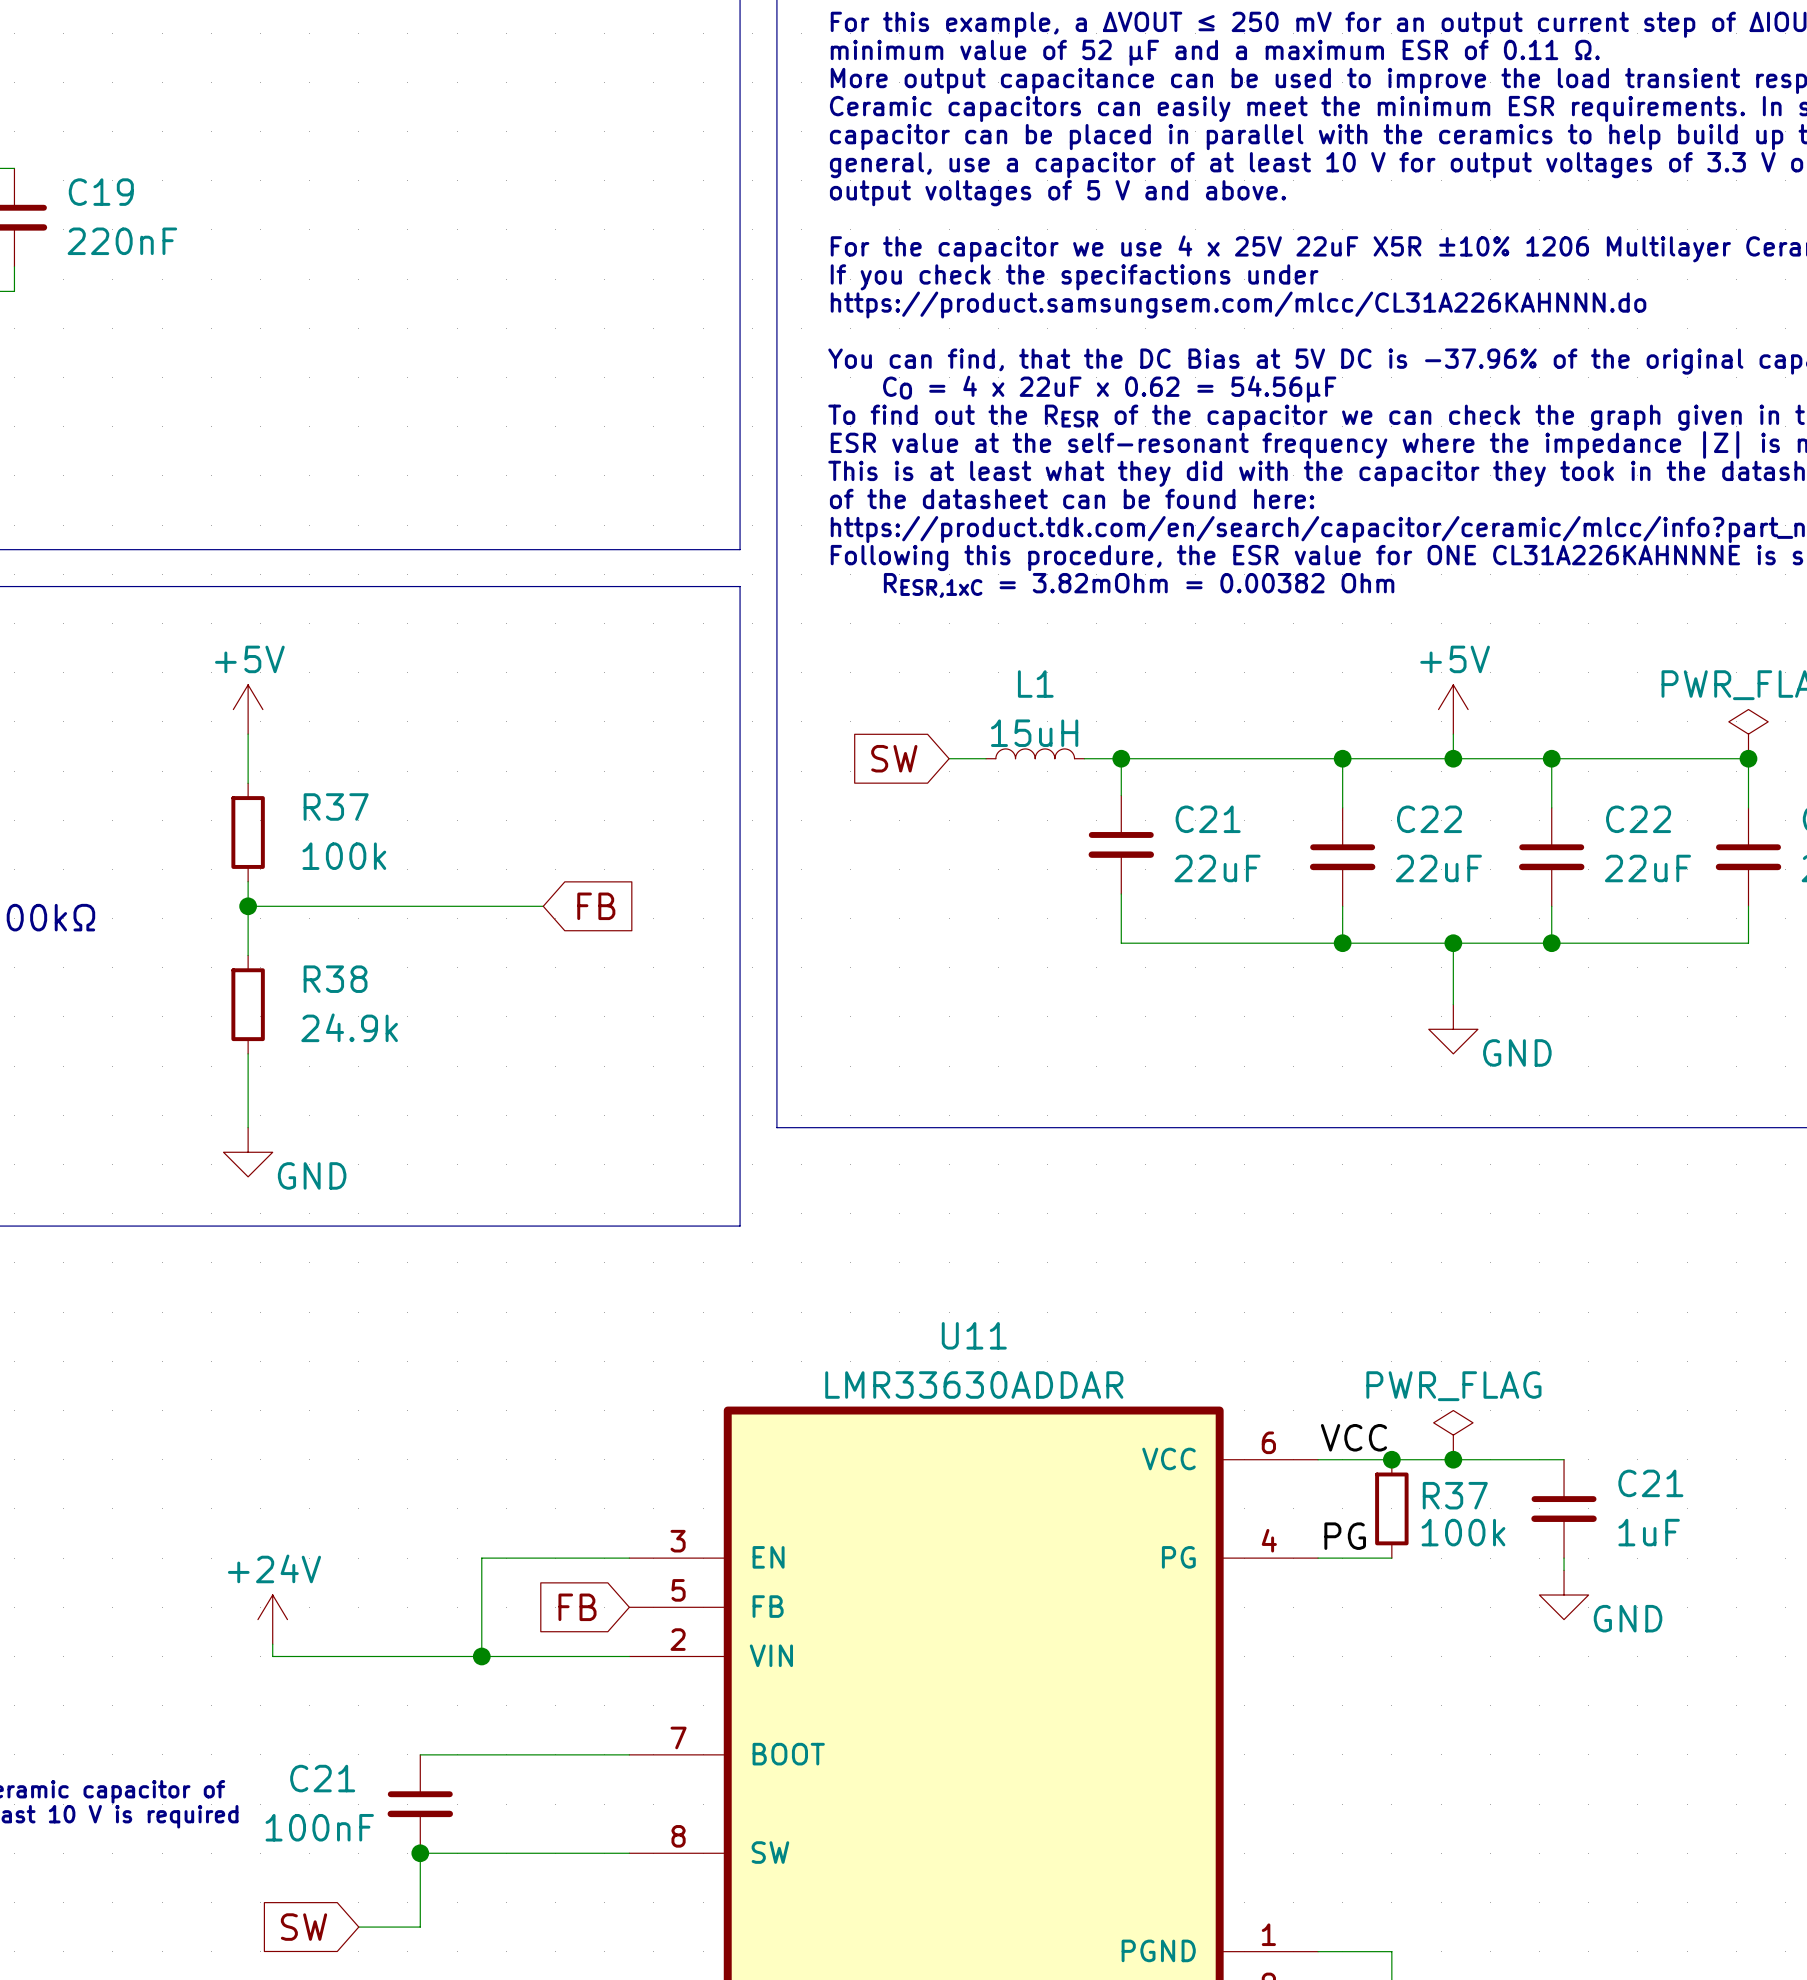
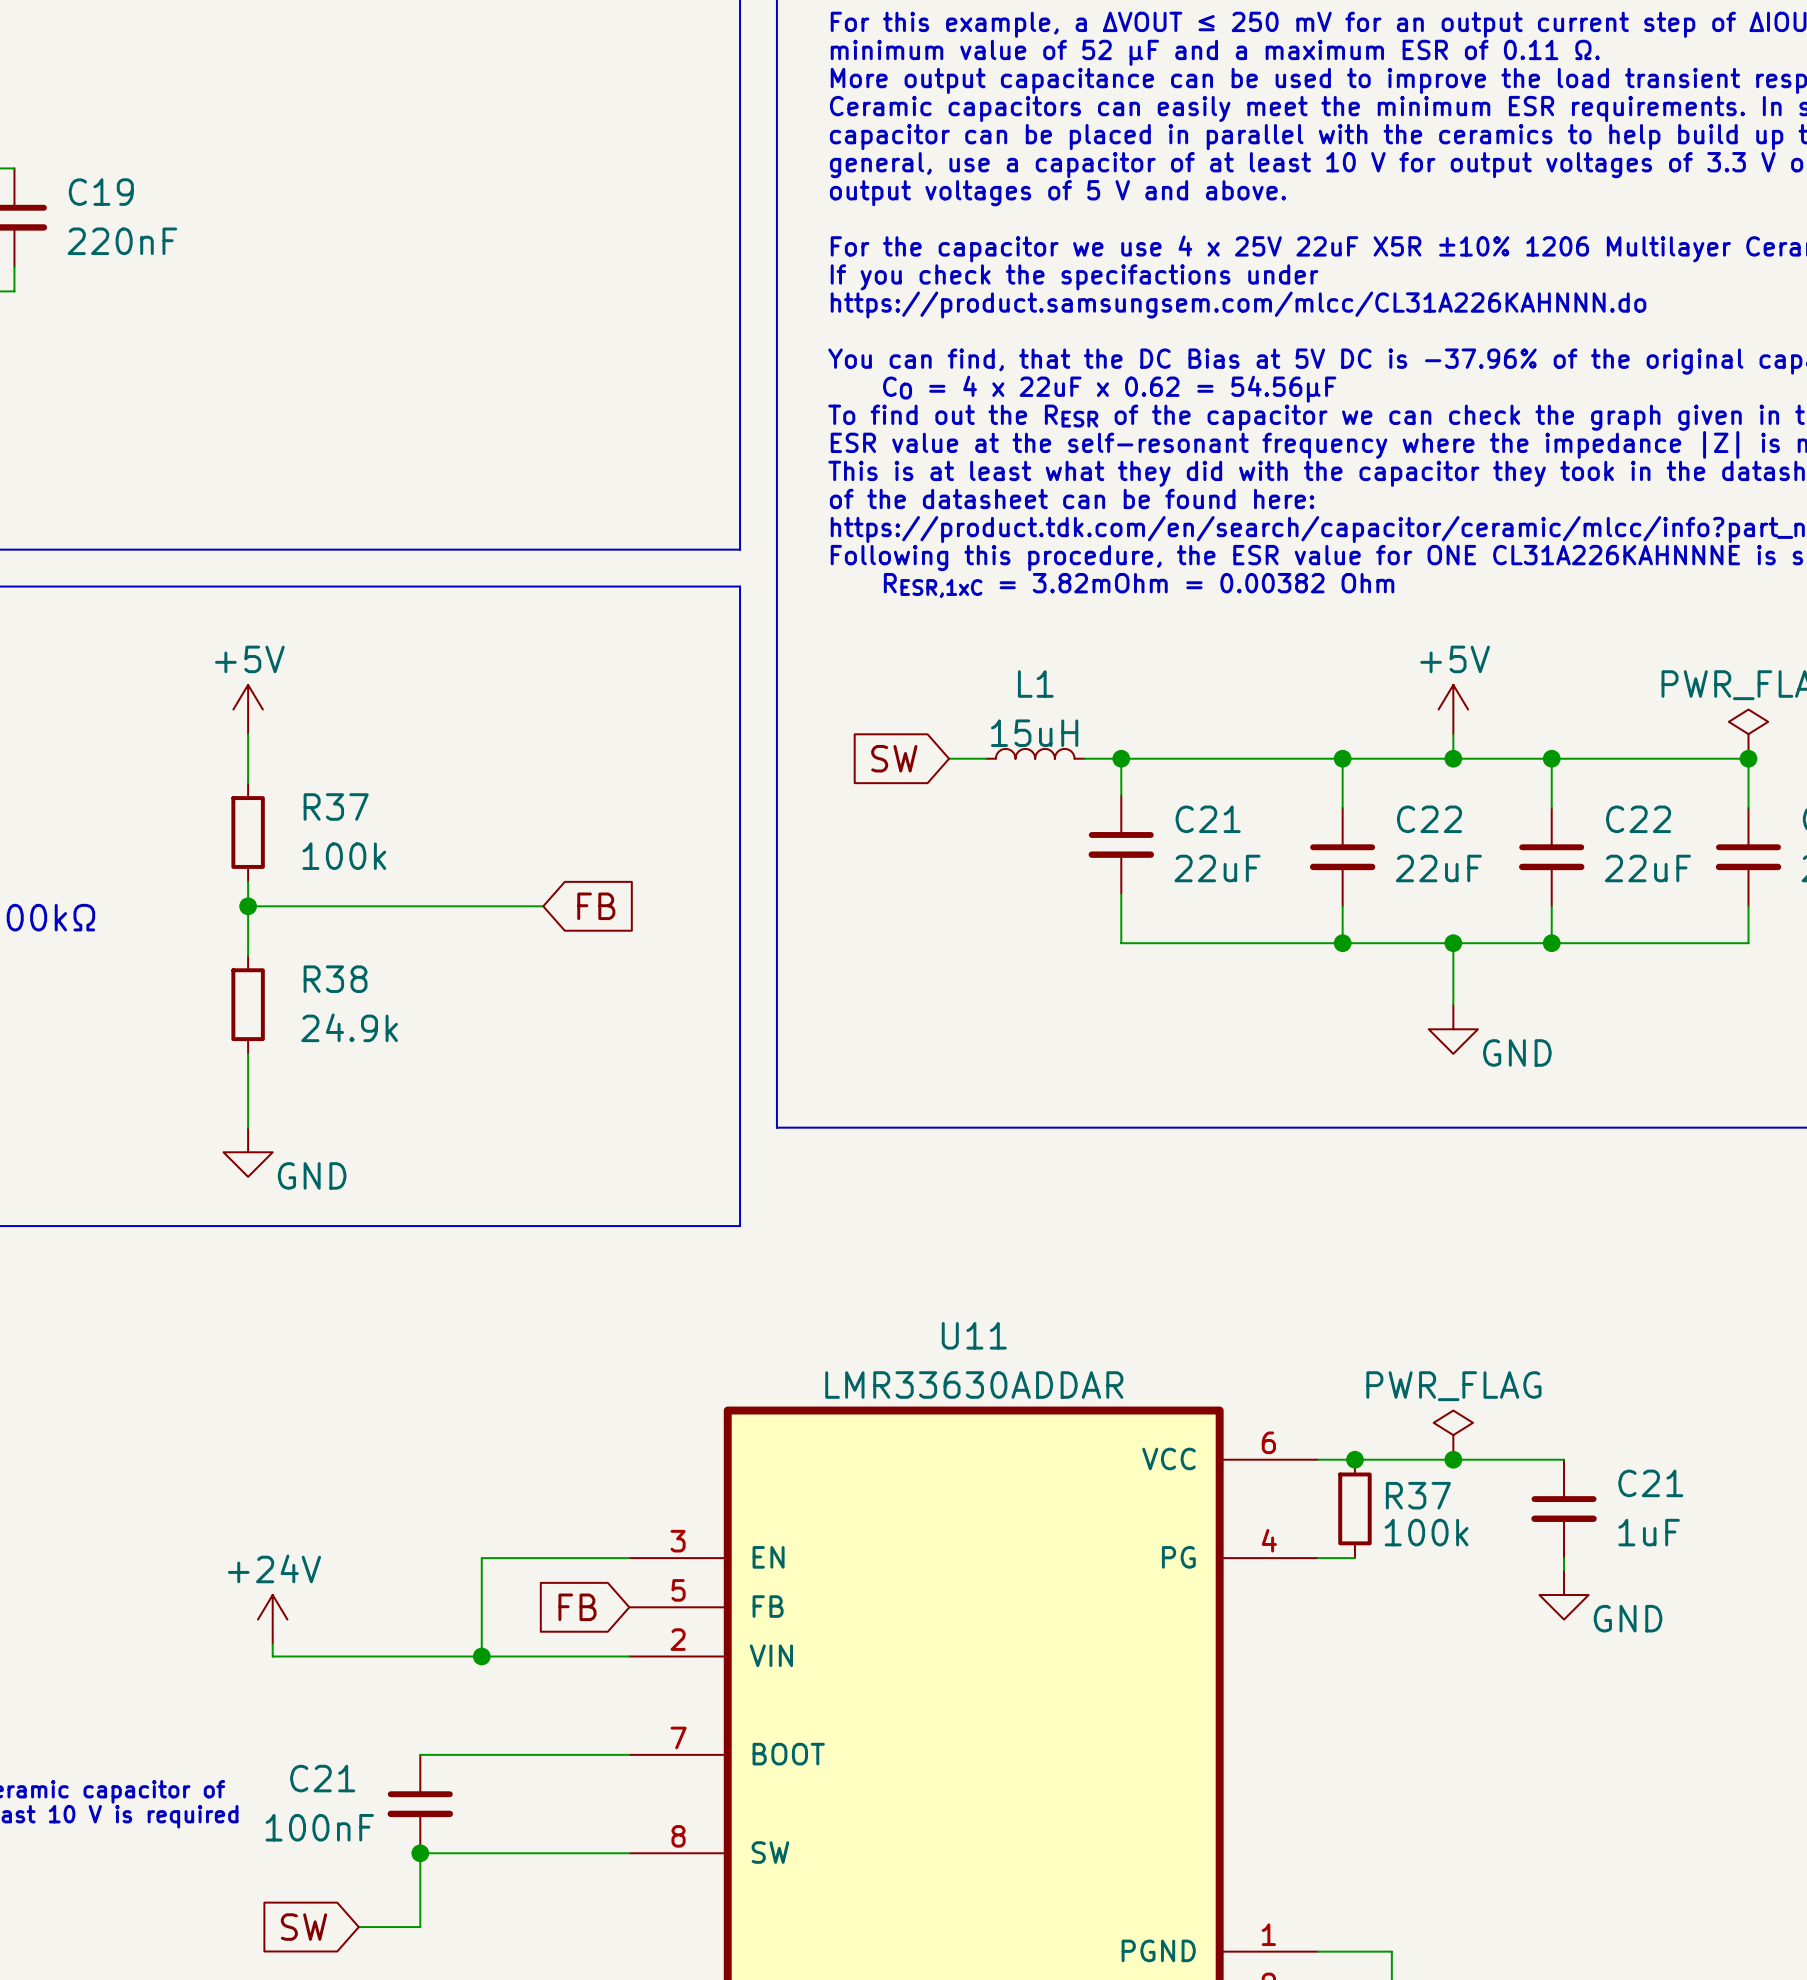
label: VCC (1353, 1437) -> none
junction position: (1391, 1459) -> (1354, 1459)
R37 position: (1391, 1508) -> (1354, 1508)
label: PG (1345, 1536) -> none
wire: (1354, 1558) (1391, 1558) -> none

